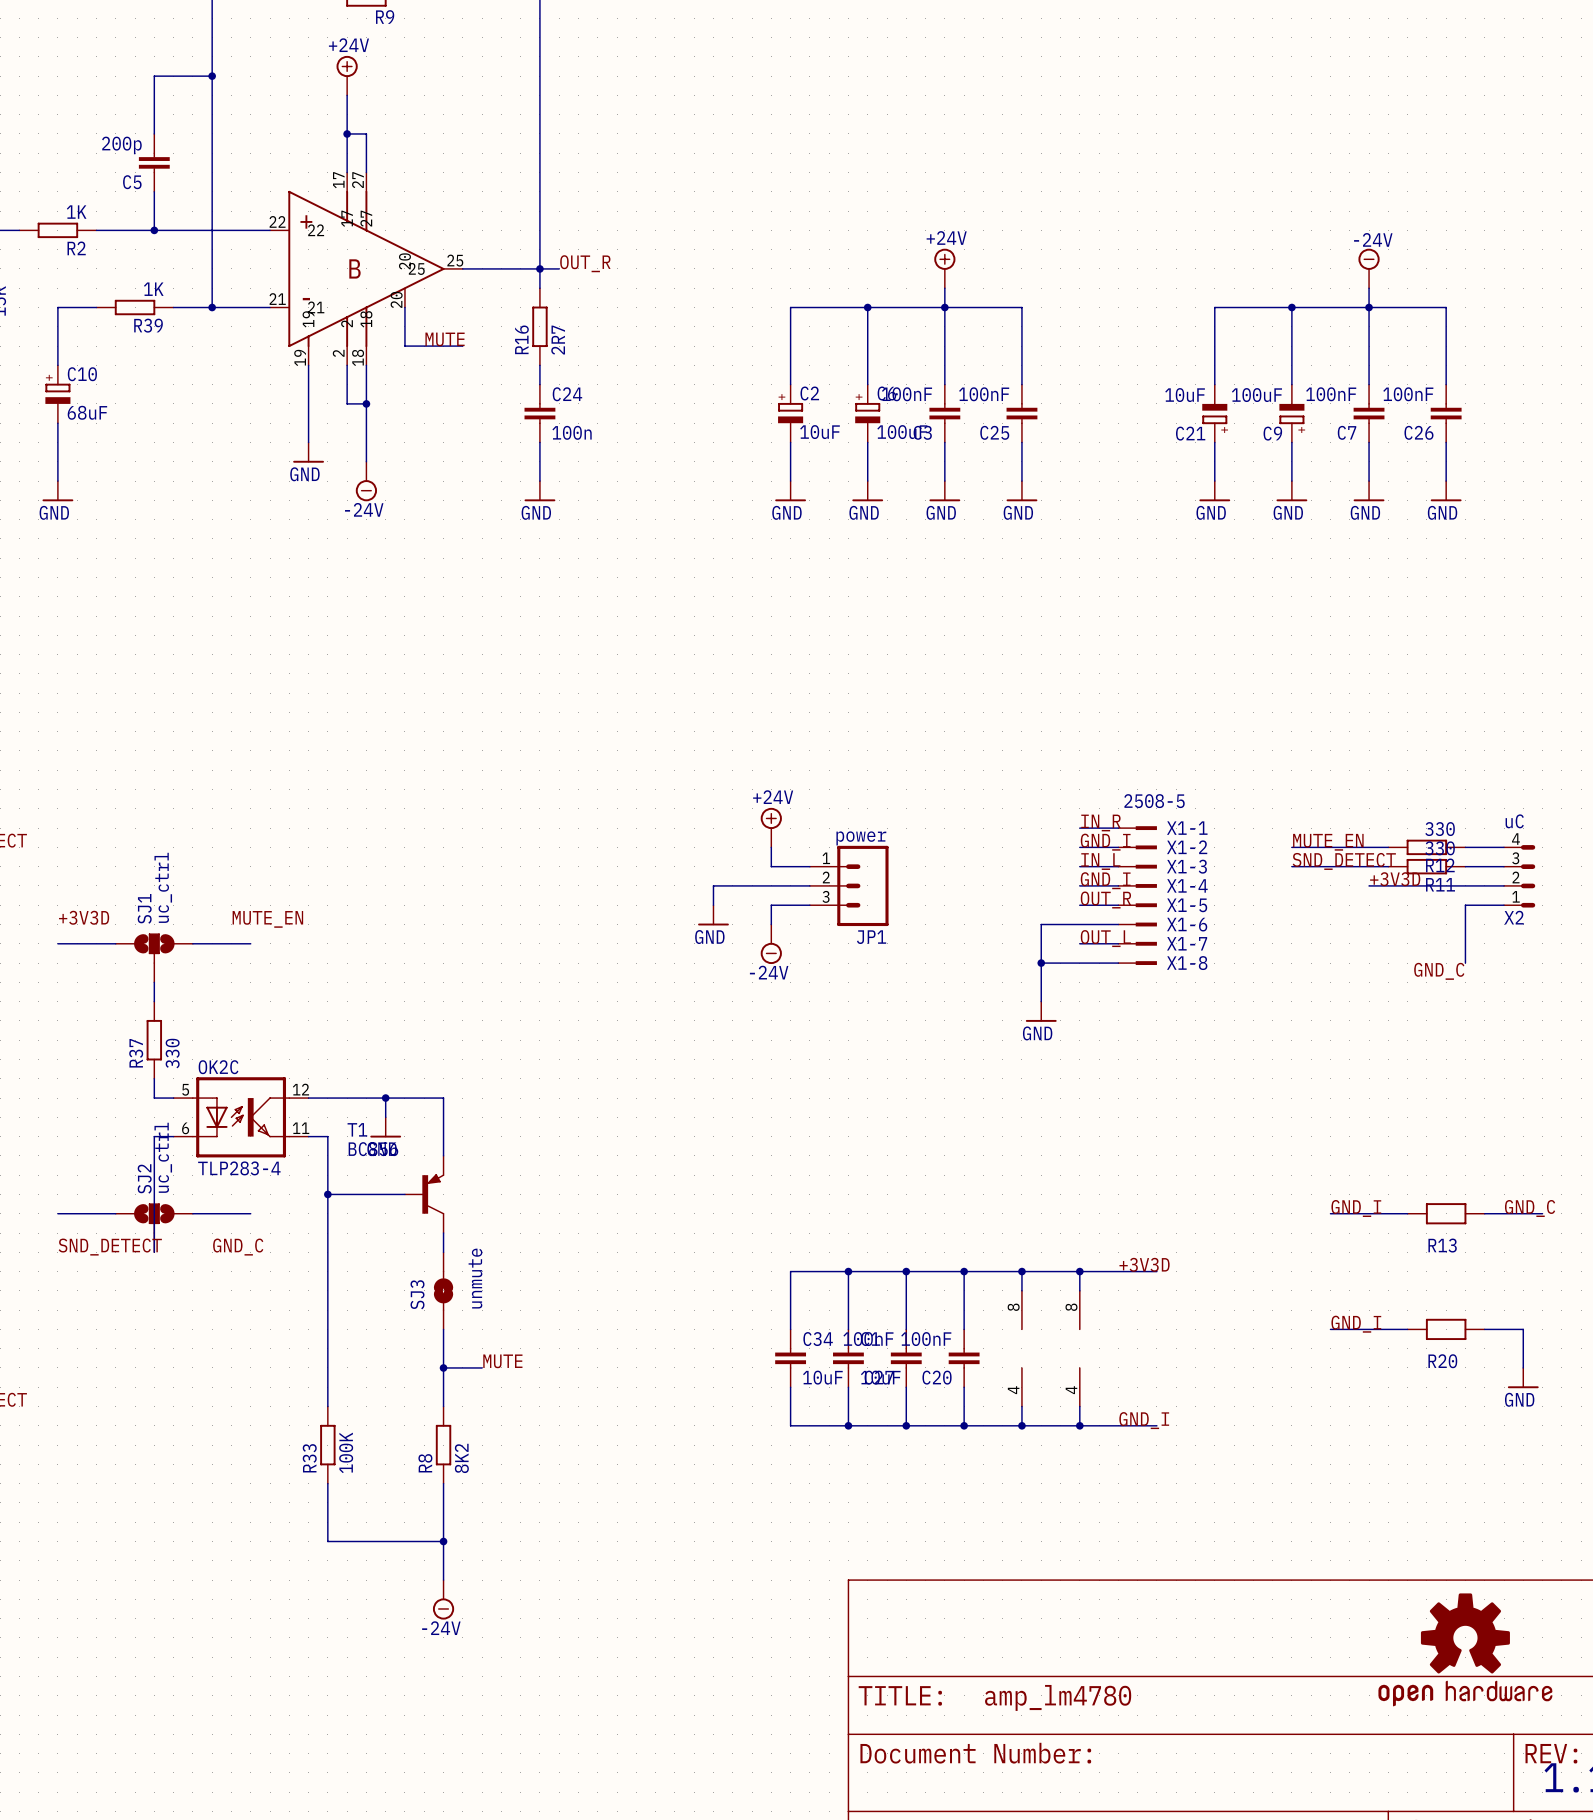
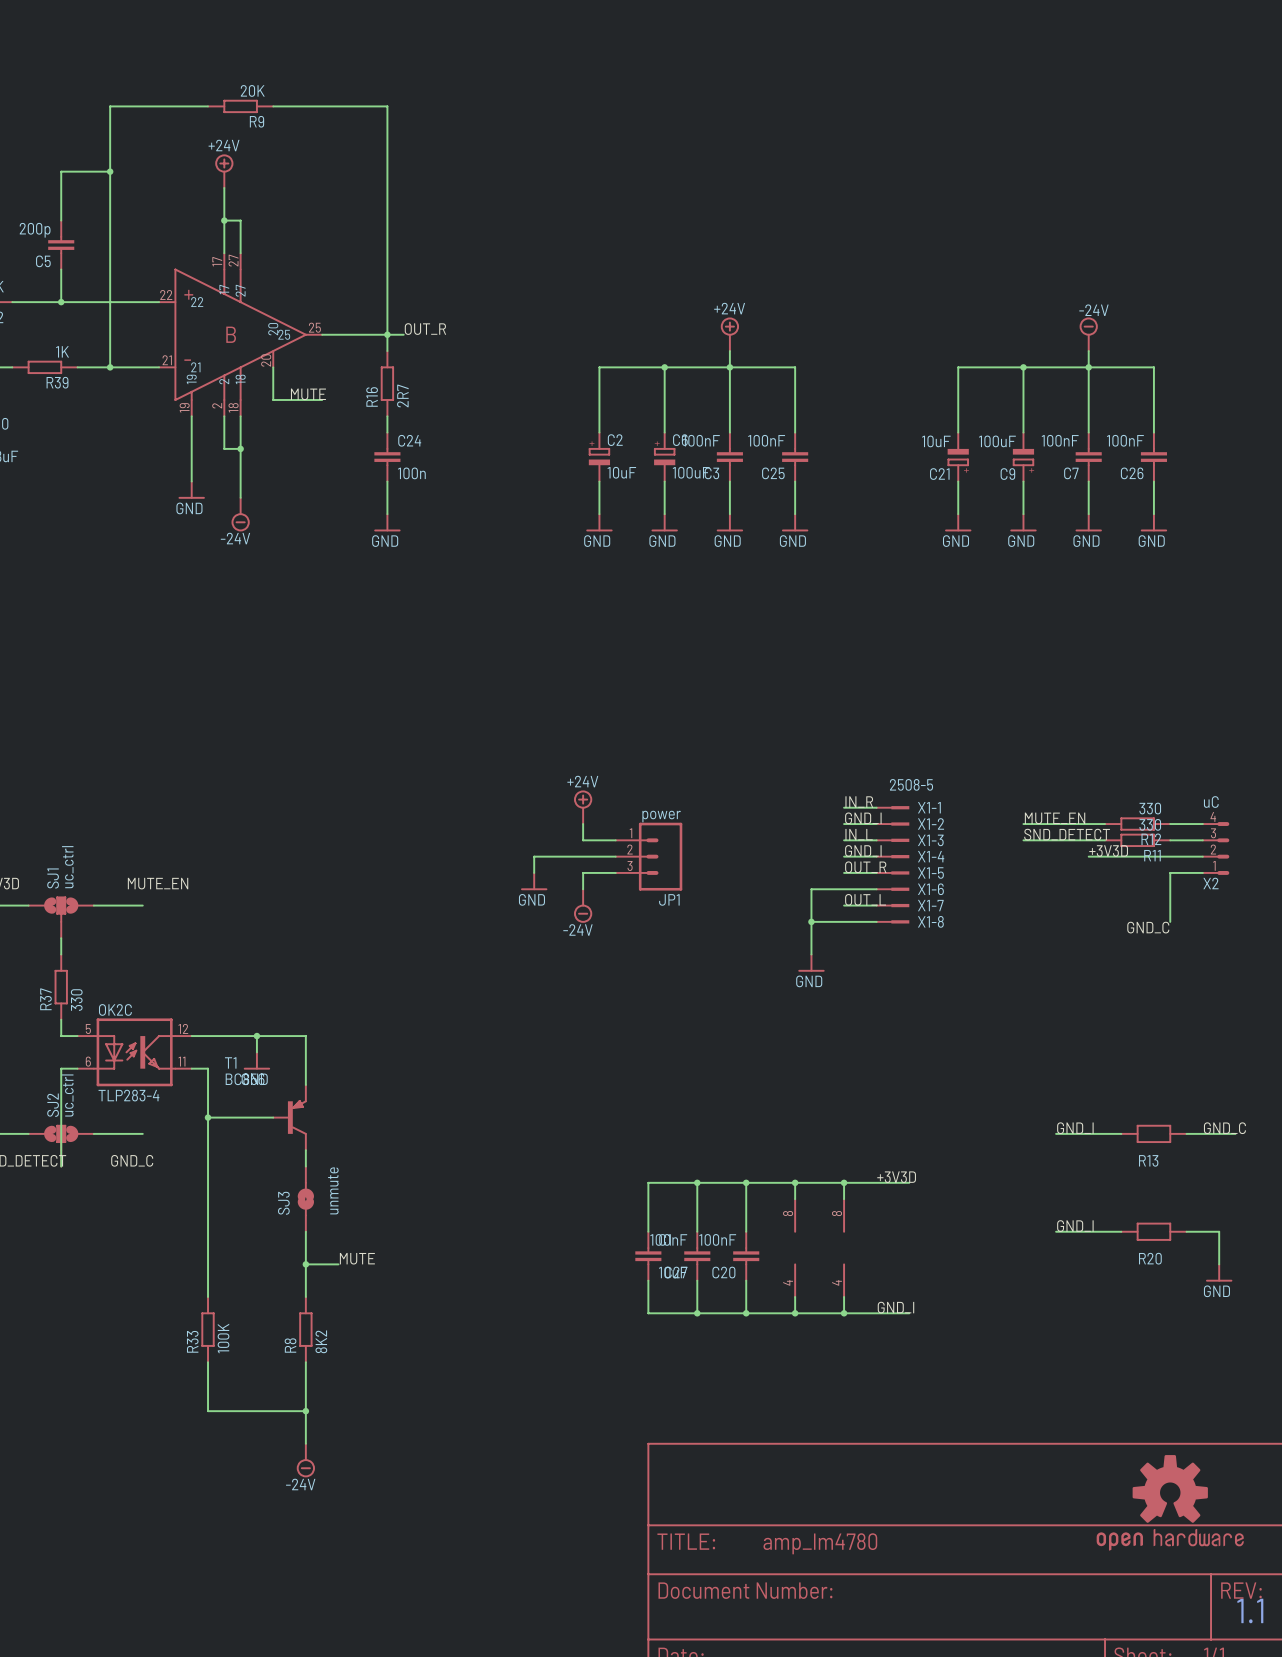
wire: (848, 1271) (790, 1271) (790, 1329) -> none
junction: (848, 1271) -> none
C34: 10uF (790, 1358) -> none
wire: (790, 1387) (790, 1425) (848, 1425) -> none
junction: (848, 1425) -> none

